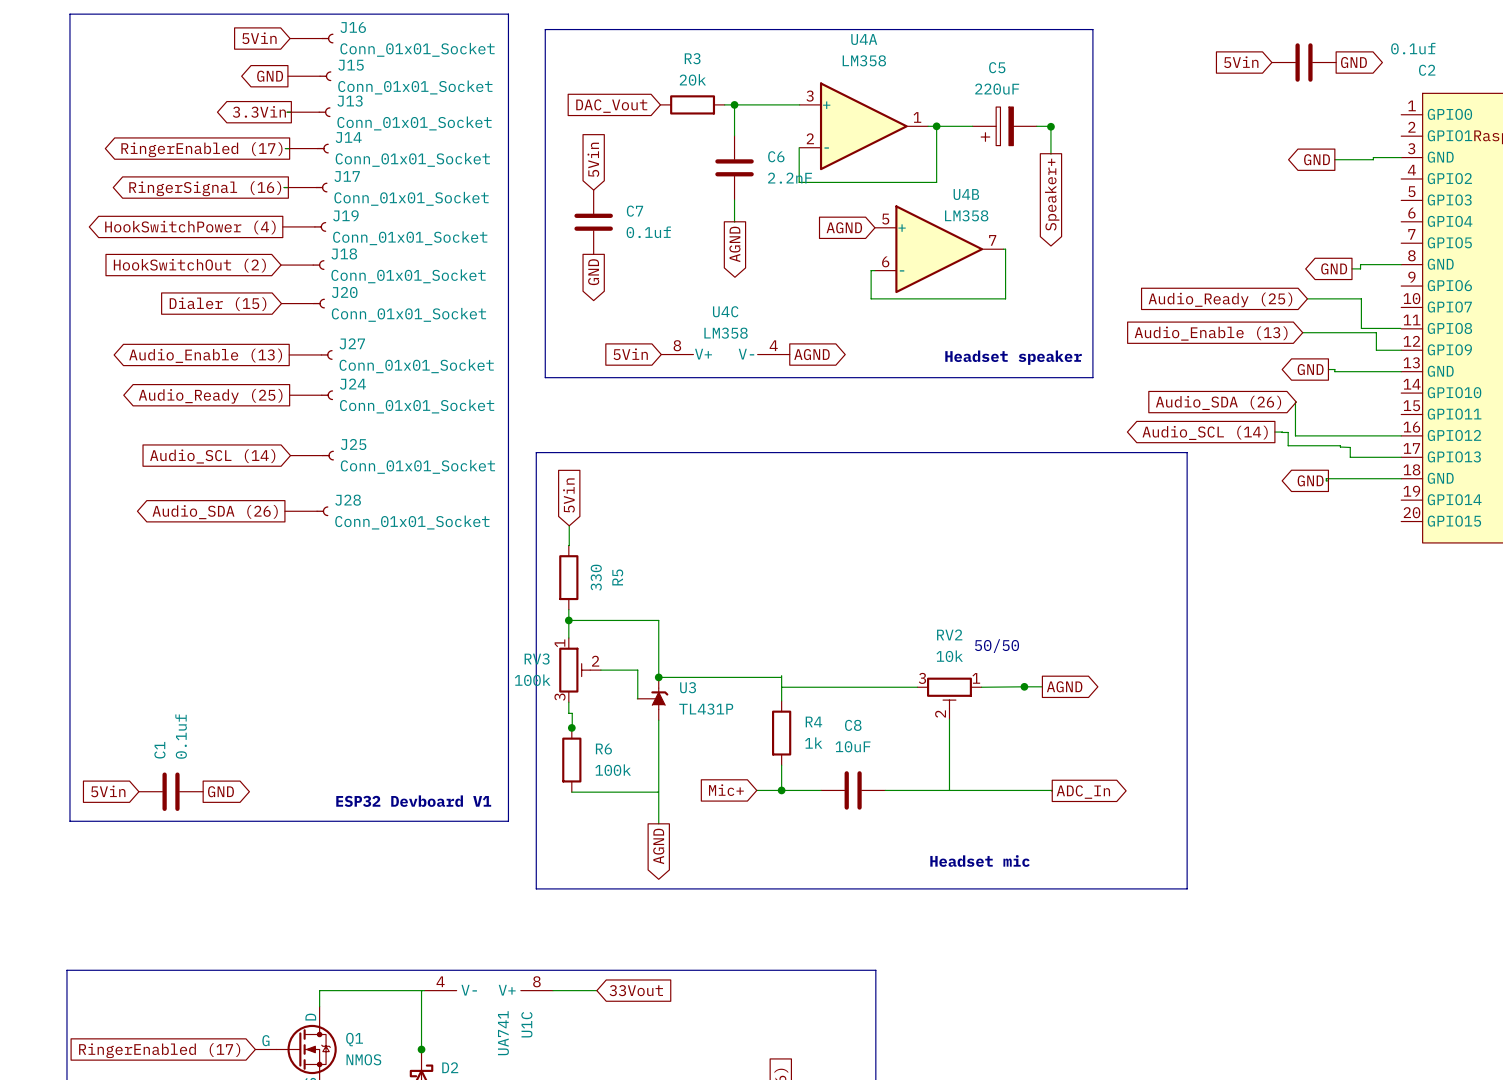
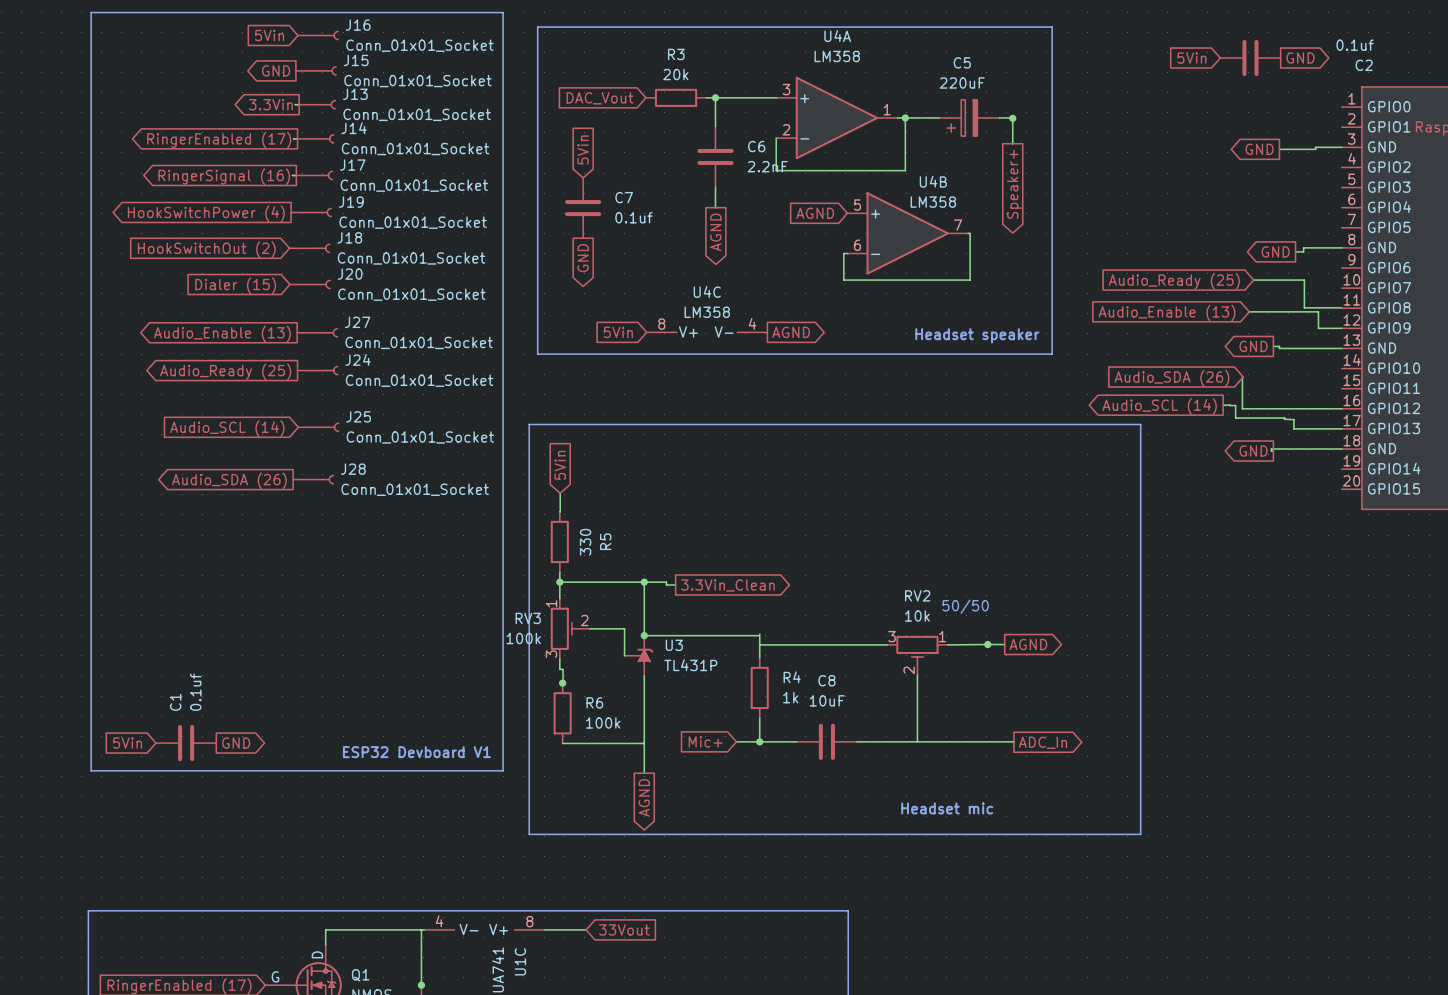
wire: none -> (644, 582) (666, 582) (666, 584) (675, 584)
junction: none -> (644, 582)
global label: none -> 3.3Vin_Clean (727, 585)

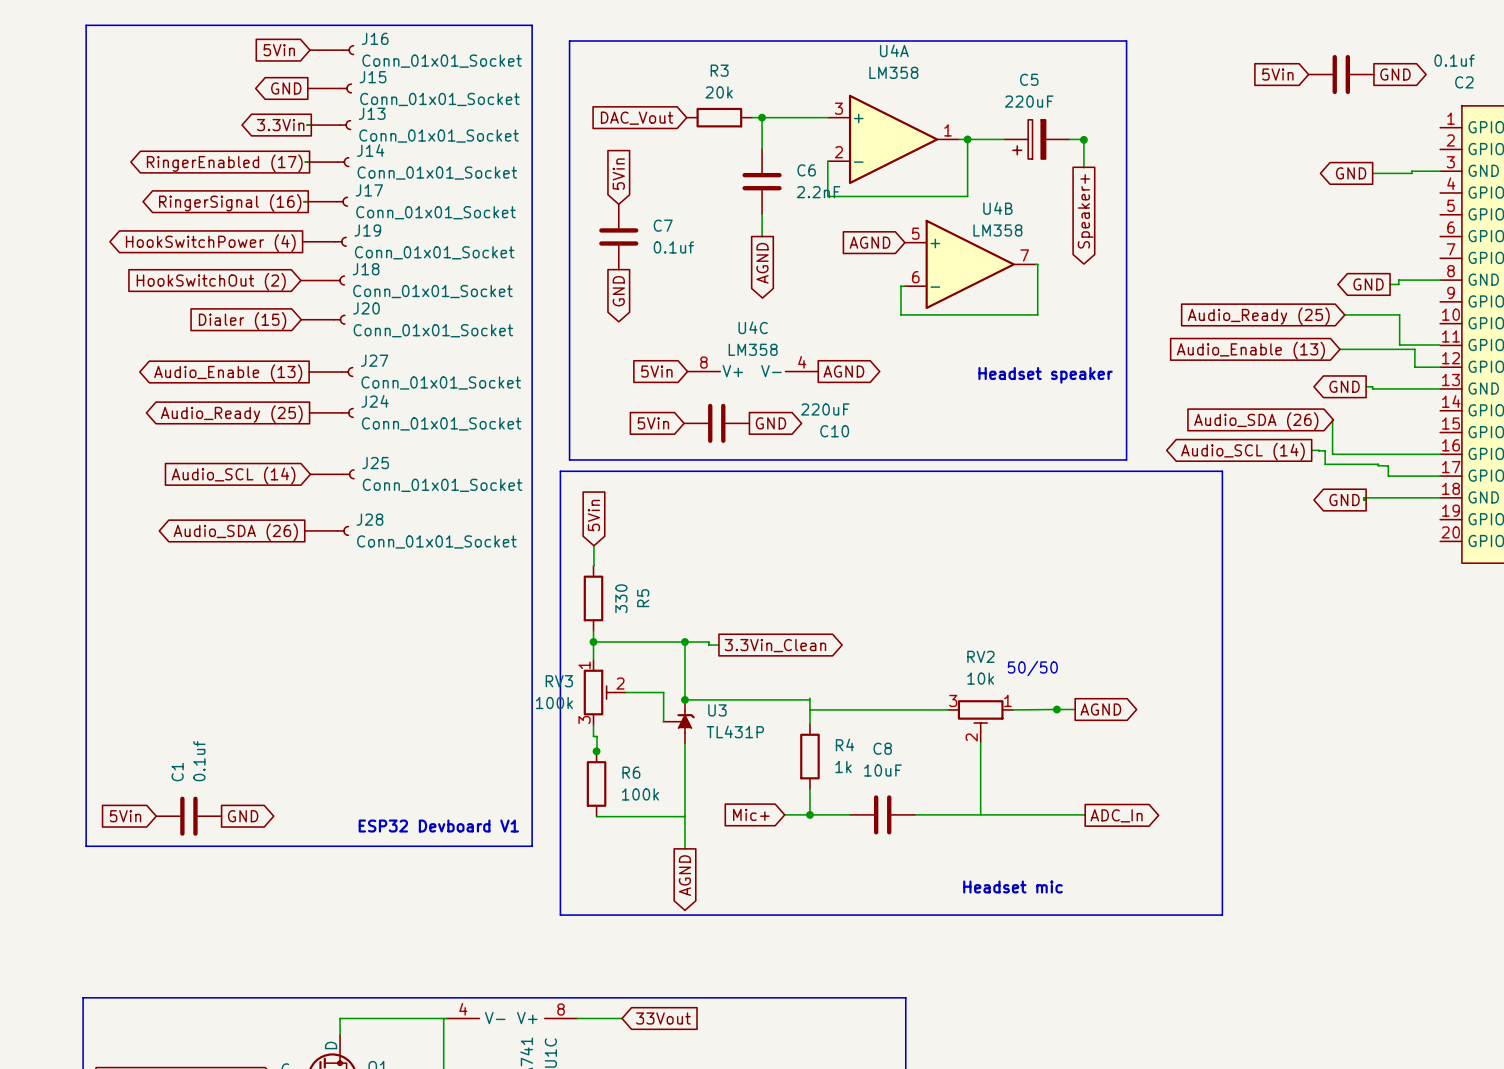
line: (537, 354) (1052, 354) -> (569, 395) (569, 459) (1126, 459) (1126, 395)
global label: none -> 5Vin (653, 423)
C10: none -> 220uF (716, 423)
global label: none -> GND (770, 423)

